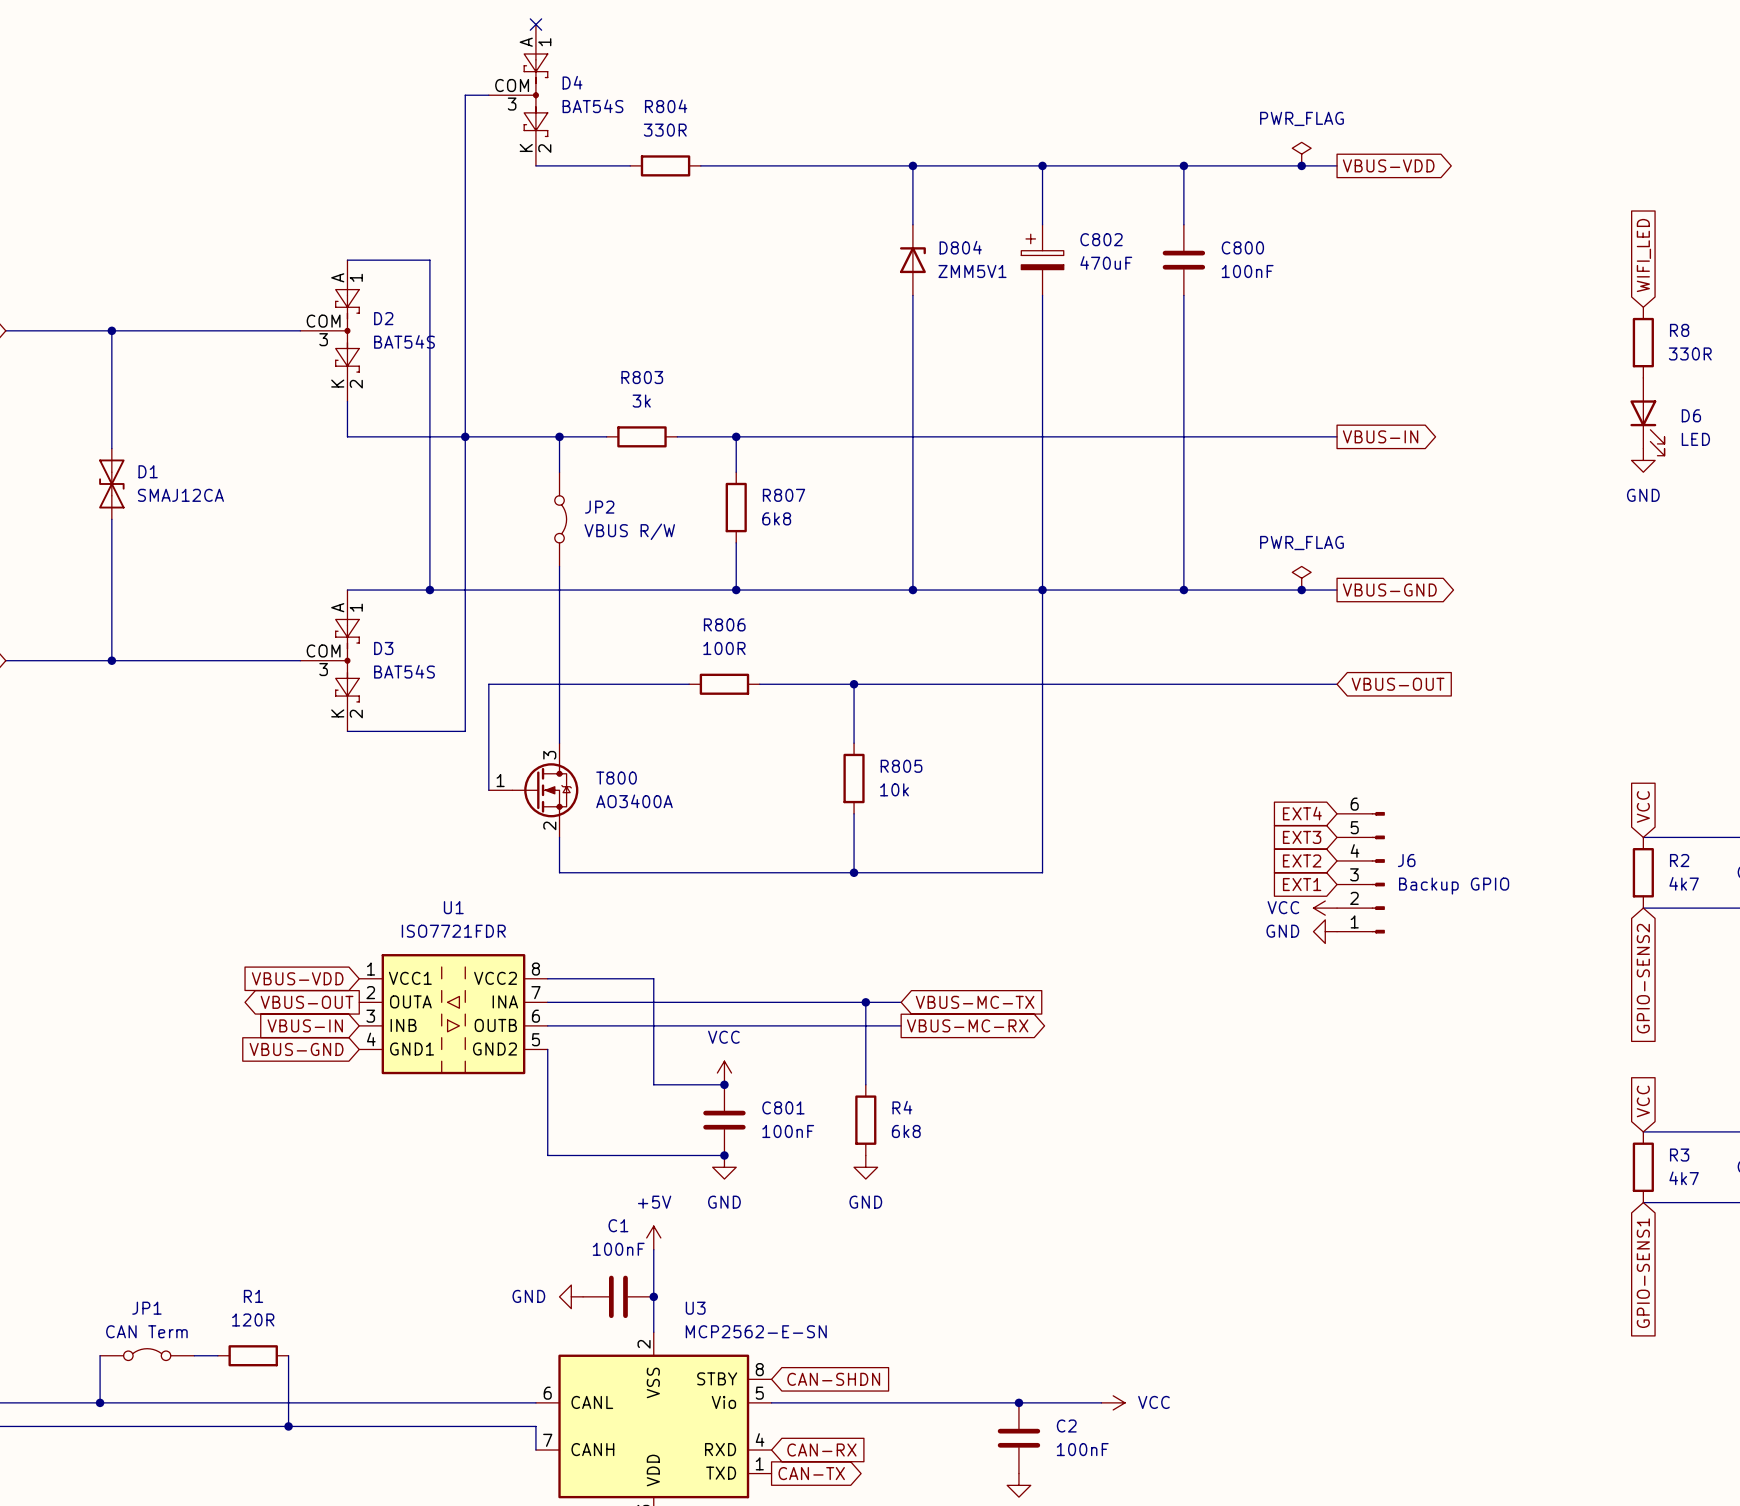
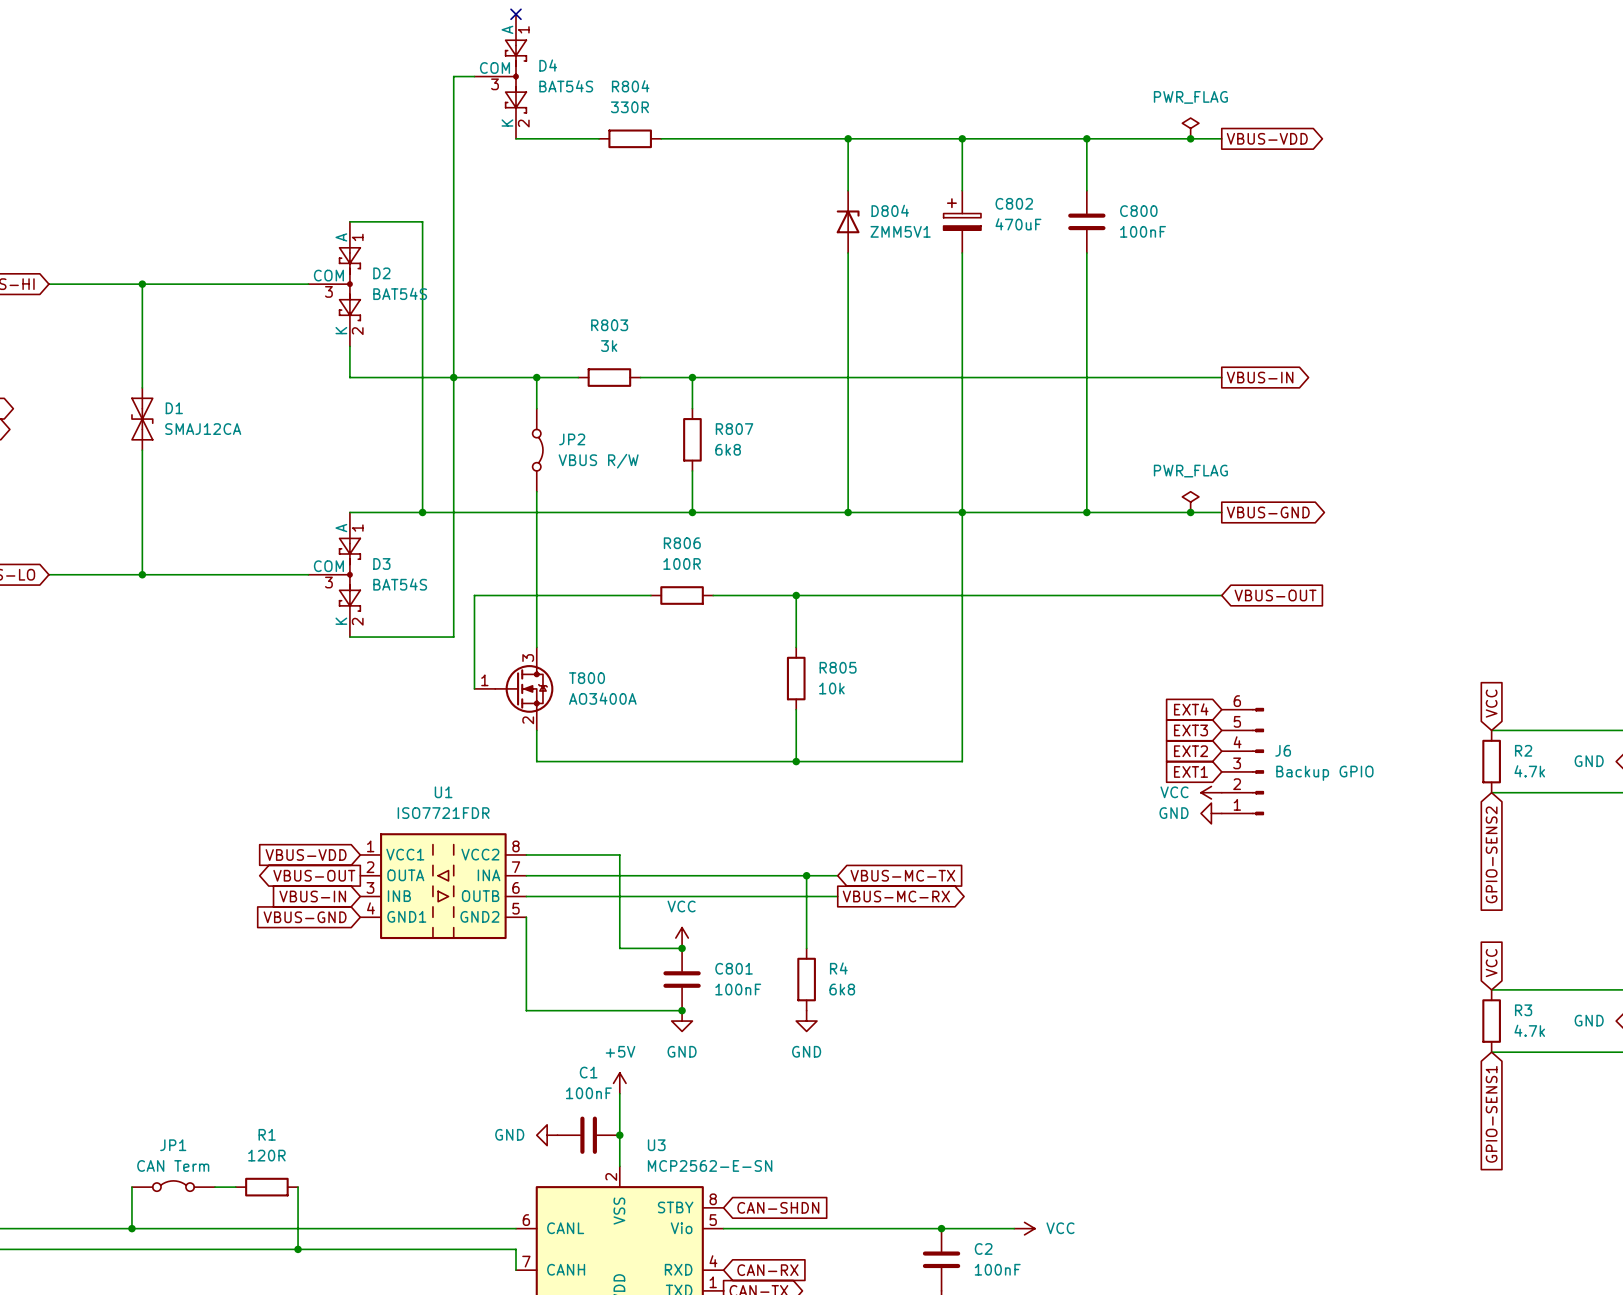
global label: WIFI_LED (1643, 255) -> none
R8: 330R (1643, 342) -> none
D6: LED (1647, 416) -> none
power symbol: GND (1643, 460) -> none
R2 value: 4k7 (1684, 883) -> 4.7k (1529, 771)
R3 value: 4k7 (1684, 1178) -> 4.7k (1529, 1030)

